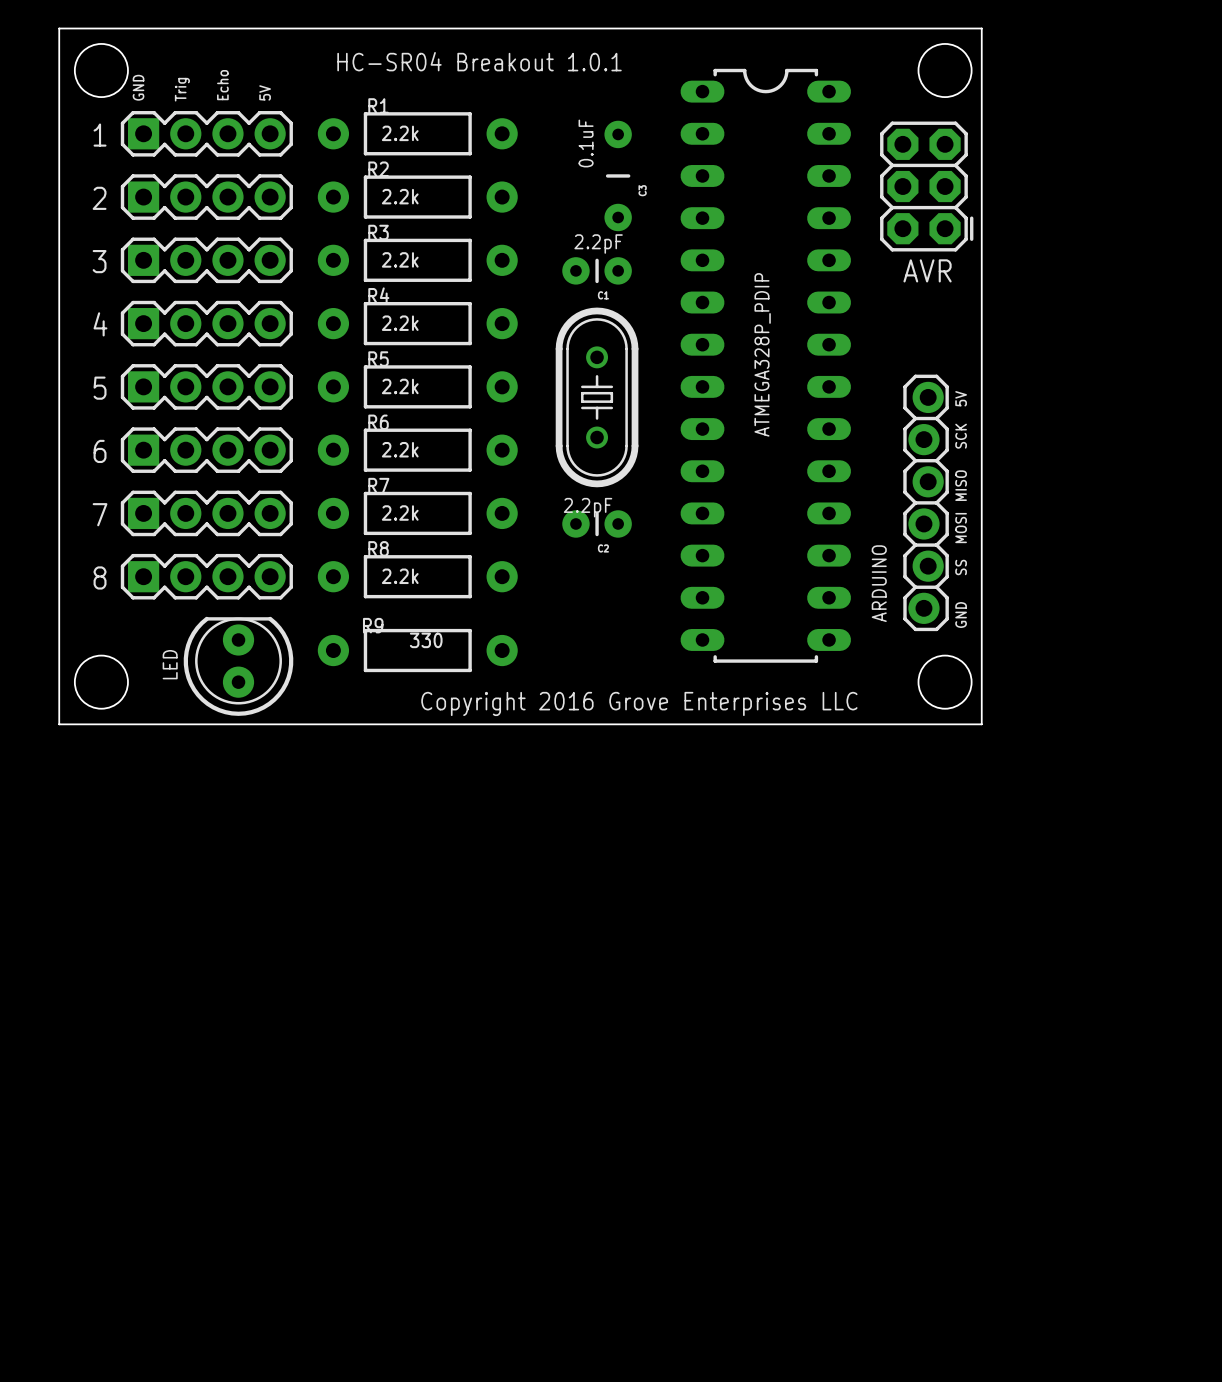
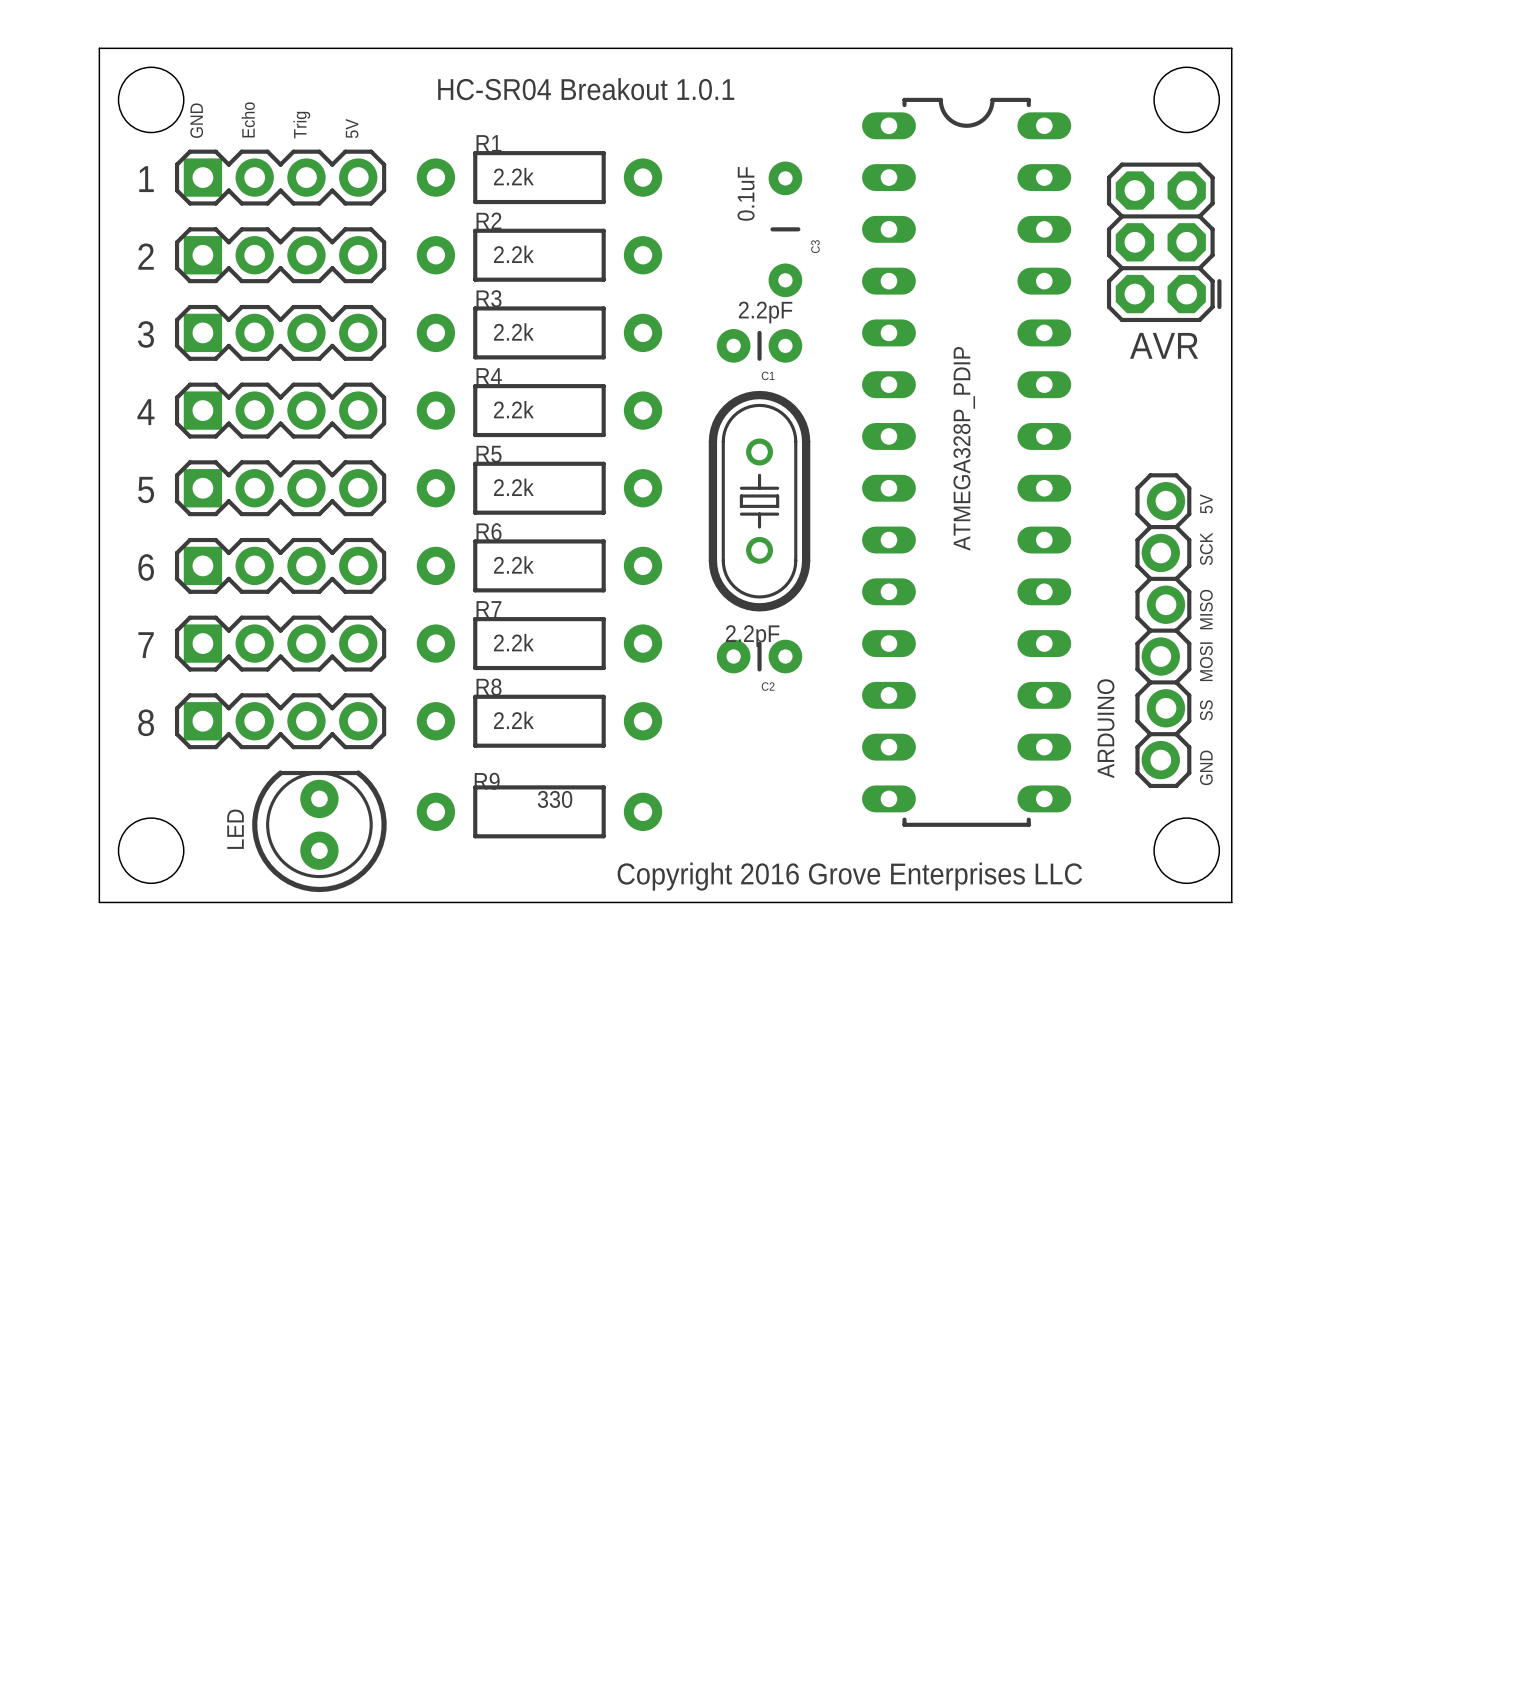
text: Echo (222, 85) -> Trig (301, 125)
text: Trig (182, 89) -> Echo (248, 119)

